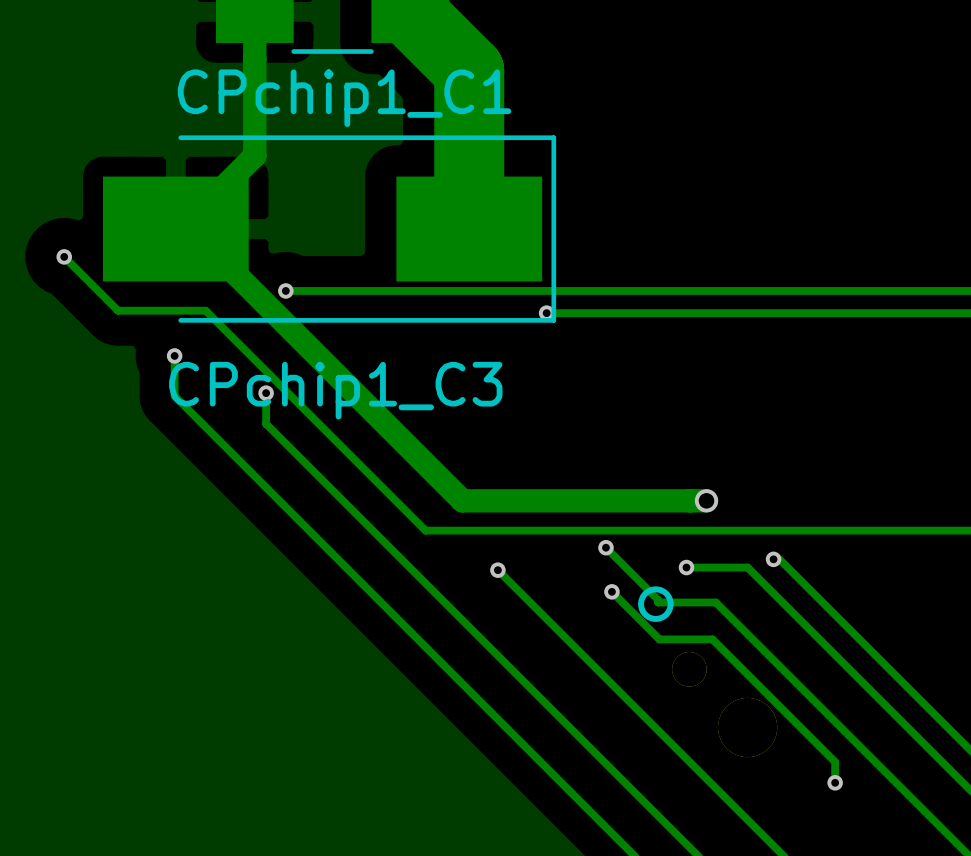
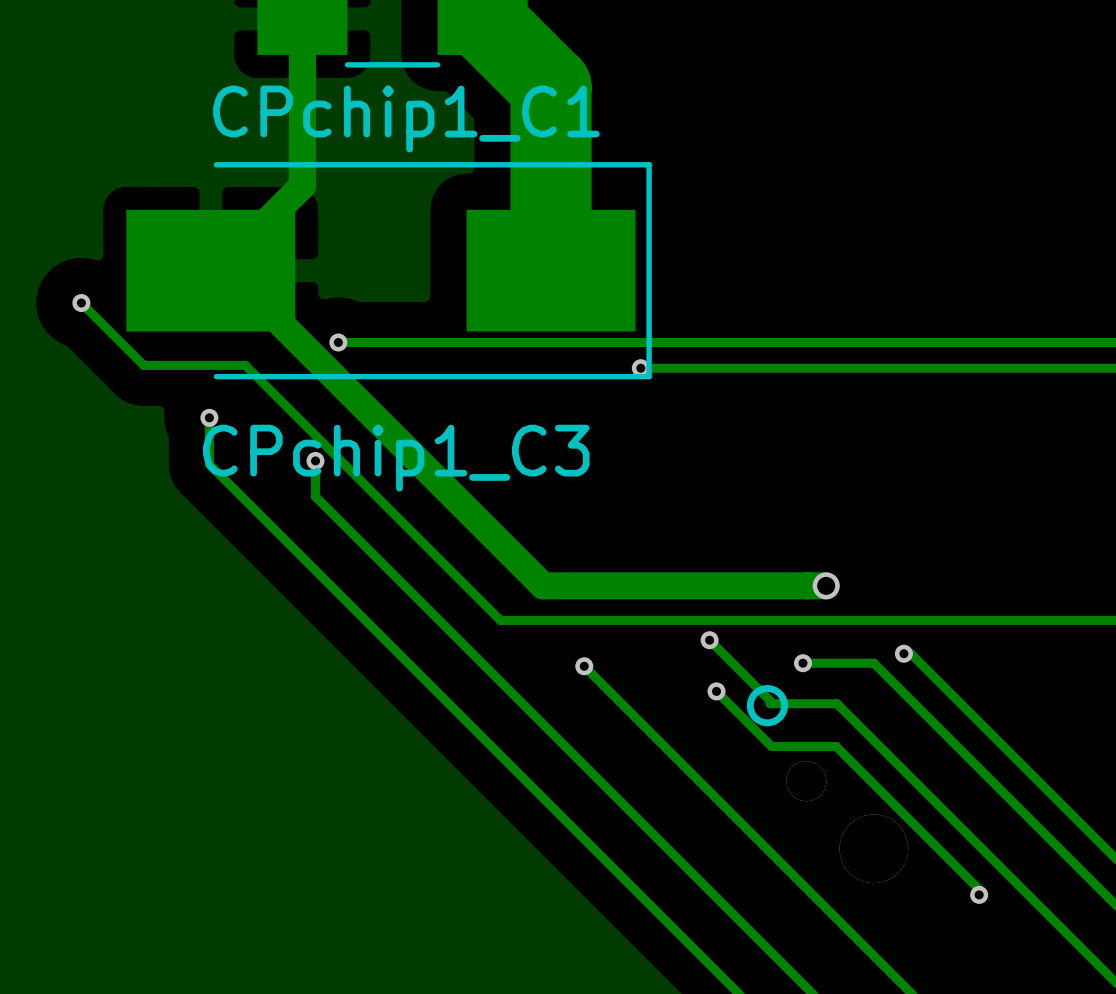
track: (712, 639) (835, 761) (835, 782) -> (833, 746) (836, 746) (979, 889) (979, 894)
via position: (835, 782) -> (979, 894)

